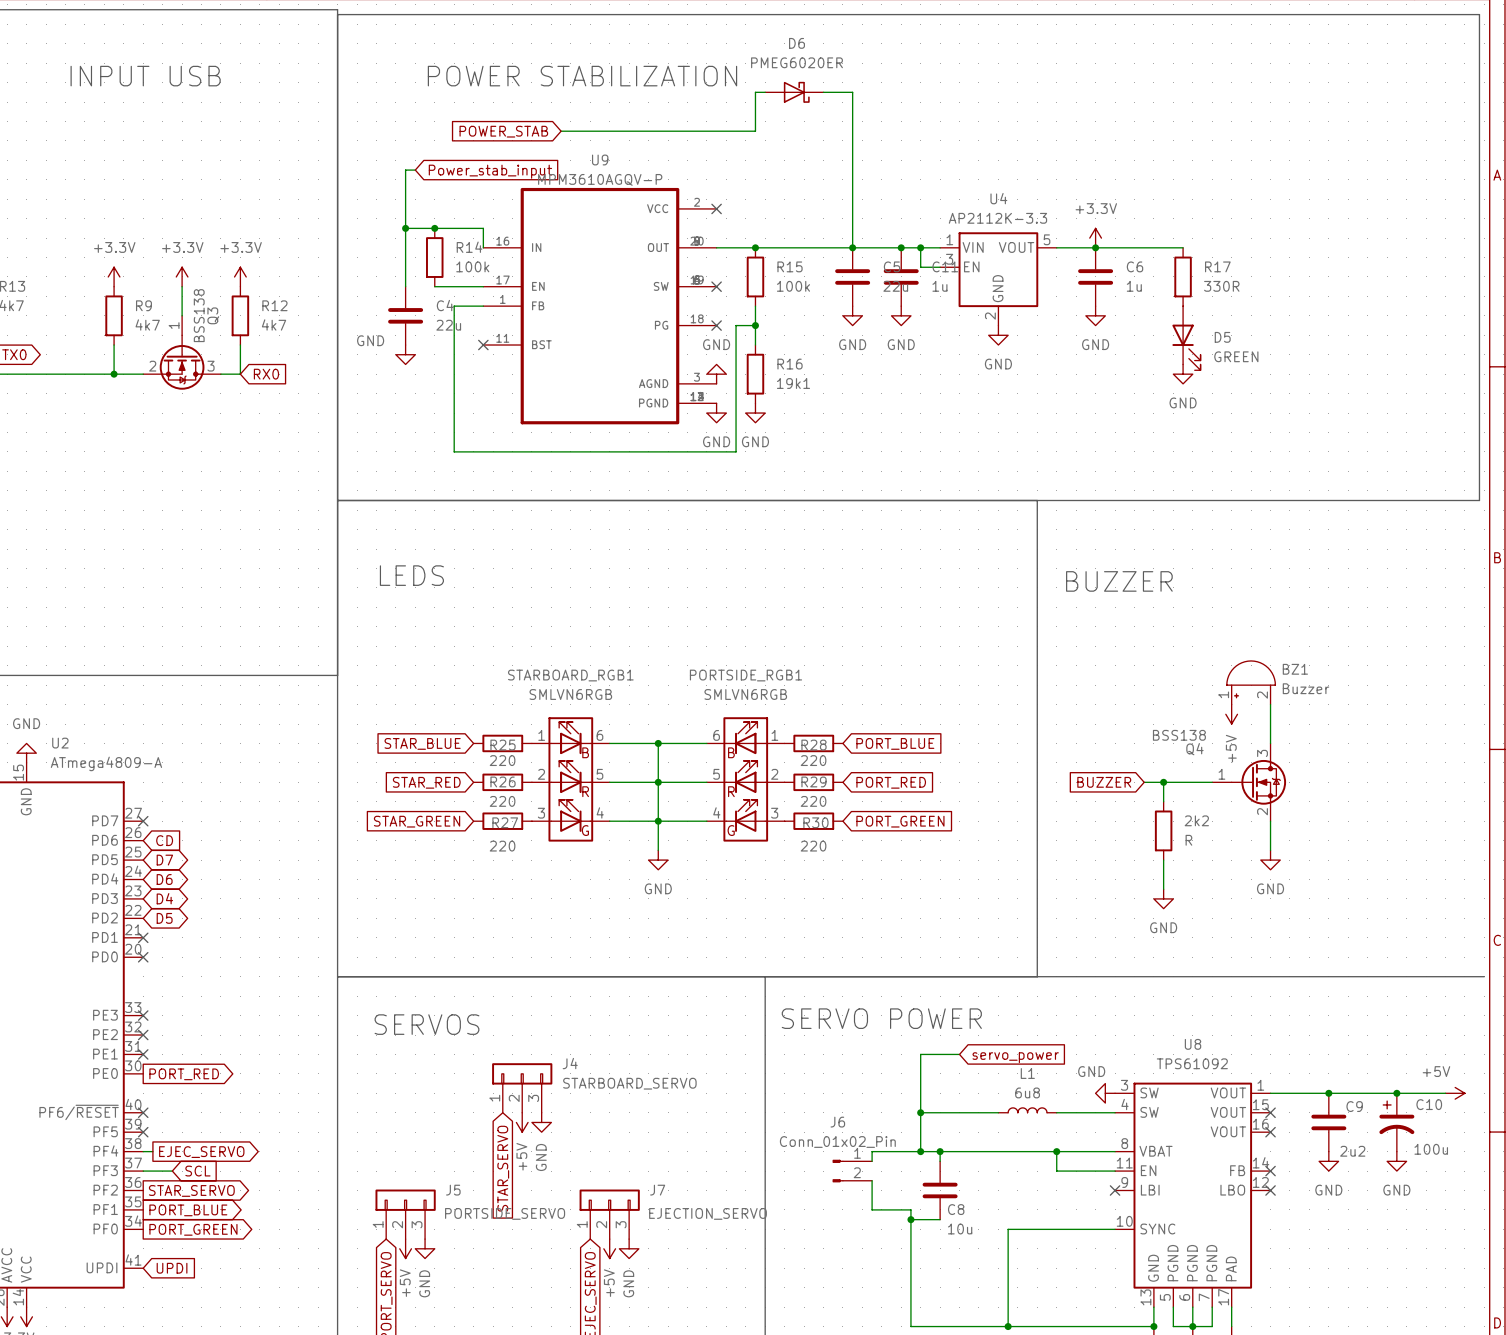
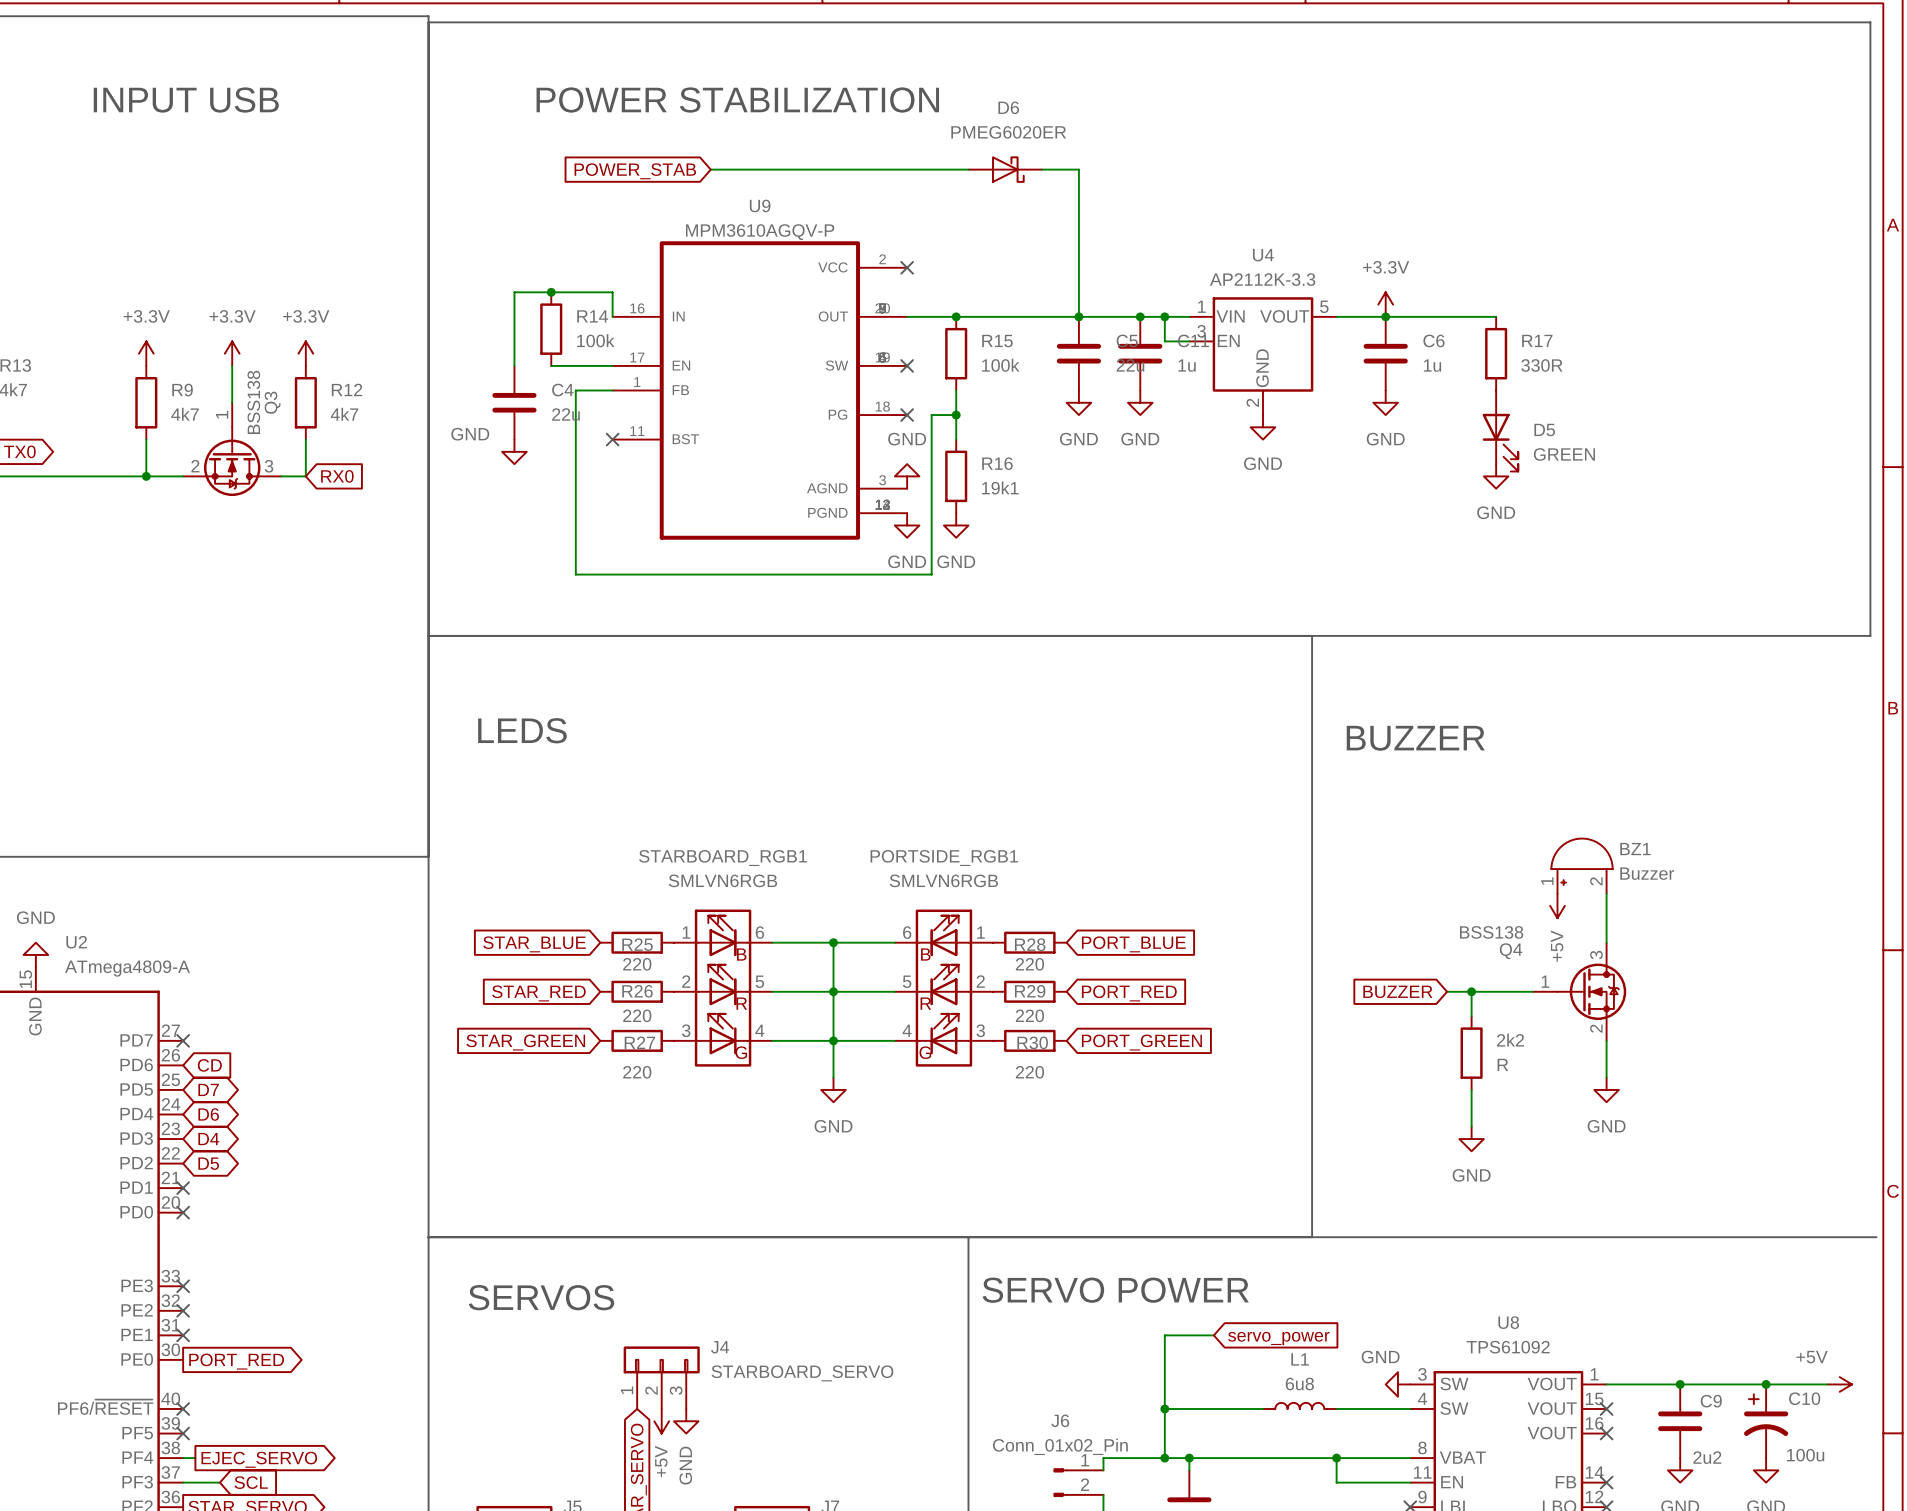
wire: (765, 92) (755, 92) (755, 131) -> (968, 169) (956, 169)
D6 position: (794, 92) -> (1005, 169)
wire: (823, 92) (852, 92) (852, 131) -> (1042, 169) (1078, 169)
wire: (415, 170) (405, 170) (405, 228) -> none
global label: Power_stab_input (490, 171) -> none
junction: (405, 228) -> none

